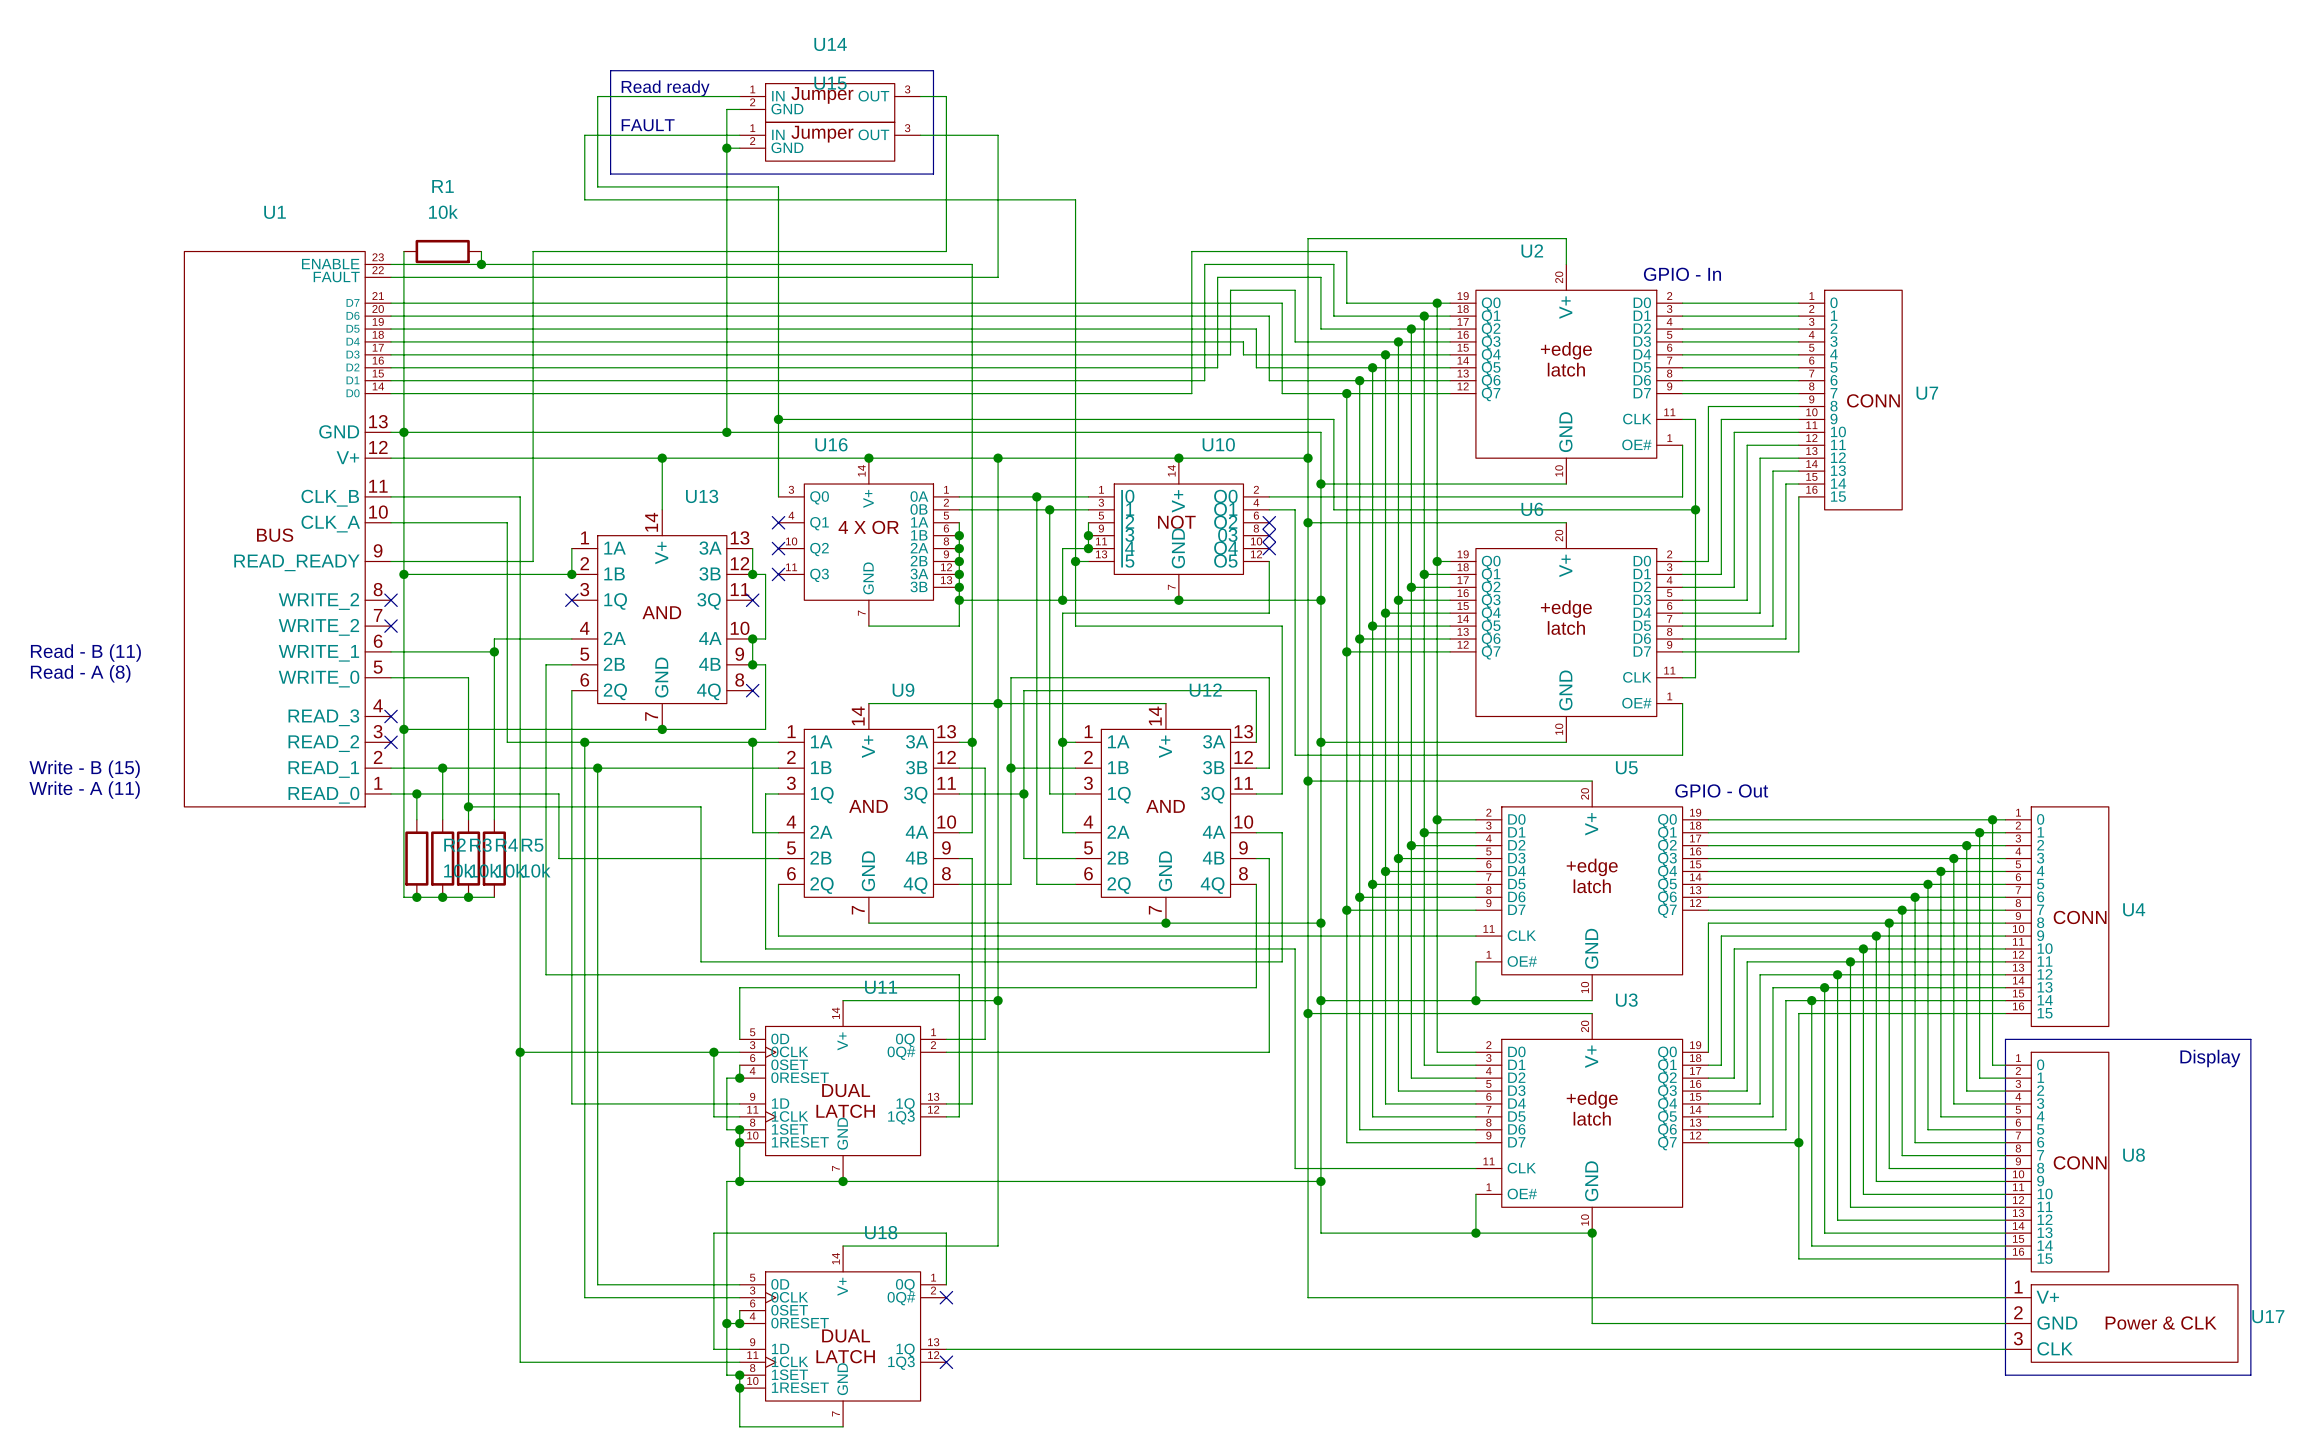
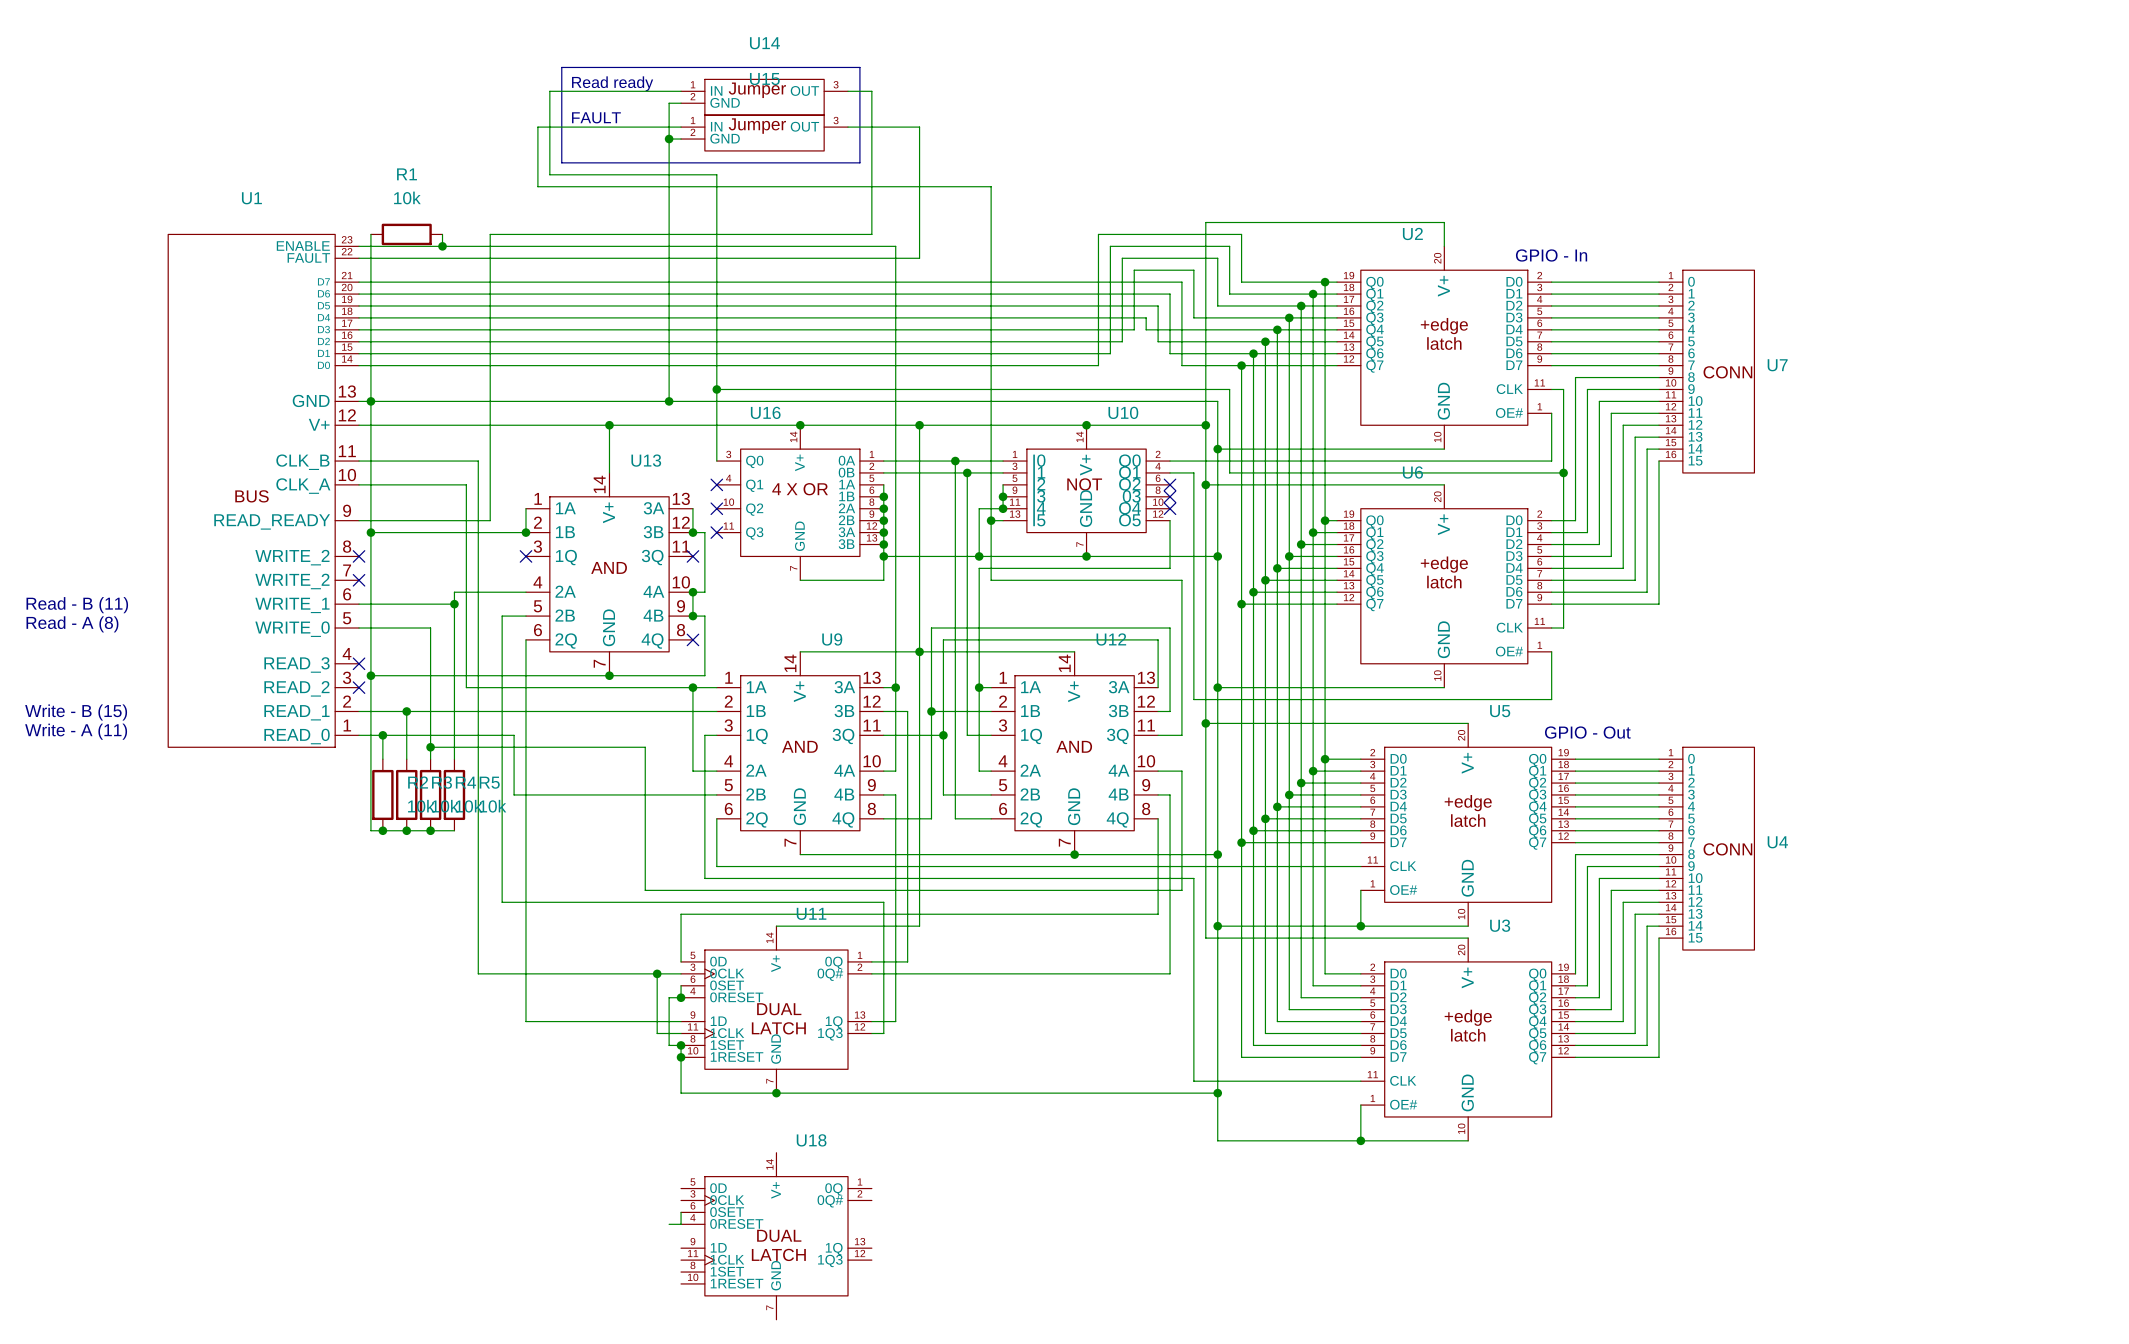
wire: (584, 742) (584, 1297) (739, 1297) -> none
junction: (584, 742) -> none
wire: (597, 768) (597, 1284) (739, 1284) -> none
junction: (597, 768) -> none
wire: (1798, 819) (2005, 819) -> none
wire: (1992, 819) (1992, 1065) (2005, 1065) -> none
junction: (1992, 819) -> none
wire: (1798, 832) (2005, 832) -> none
wire: (1979, 832) (1979, 1078) (2005, 1078) -> none
junction: (1979, 832) -> none
wire: (1798, 845) (2005, 845) -> none
wire: (1966, 845) (1966, 1091) (2005, 1091) -> none
junction: (1966, 845) -> none
wire: (1798, 858) (2005, 858) -> none
wire: (1953, 858) (1953, 1103) (2005, 1103) -> none
junction: (1953, 858) -> none
wire: (1798, 871) (2005, 871) -> none
wire: (1940, 871) (1940, 1116) (2005, 1116) -> none
junction: (1940, 871) -> none
wire: (1798, 884) (2005, 884) -> none
wire: (1927, 884) (1927, 1129) (2005, 1129) -> none
junction: (1927, 884) -> none
wire: (1798, 897) (2005, 897) -> none
wire: (1915, 897) (1915, 1142) (2005, 1142) -> none
junction: (1915, 897) -> none
wire: (1798, 910) (2005, 910) -> none
wire: (1902, 910) (1902, 1155) (2005, 1155) -> none
junction: (1902, 910) -> none
U4 position: (2057, 916) -> (1706, 848)
wire: (1798, 923) (2005, 923) -> none
wire: (1889, 923) (1889, 1168) (2005, 1168) -> none
junction: (1889, 923) -> none
wire: (1798, 936) (2005, 936) -> none
wire: (1876, 936) (1876, 1181) (2005, 1181) -> none
junction: (1876, 936) -> none
wire: (1798, 948) (2005, 948) -> none
wire: (1863, 948) (1863, 1194) (2005, 1194) -> none
junction: (1863, 948) -> none
wire: (1798, 961) (2005, 961) -> none
wire: (1850, 961) (1850, 1207) (2005, 1207) -> none
junction: (1850, 961) -> none
wire: (1798, 974) (2005, 974) -> none
wire: (1837, 974) (1837, 1220) (2005, 1220) -> none
junction: (1837, 974) -> none
wire: (1798, 987) (2005, 987) -> none
wire: (1824, 987) (1824, 1233) (2005, 1233) -> none
junction: (1824, 987) -> none
wire: (998, 1000) (998, 1246) (843, 1246) -> none
junction: (998, 1000) -> none
wire: (1798, 1000) (2005, 1000) -> none
wire: (1811, 1000) (1811, 1246) (2005, 1246) -> none
junction: (1811, 1000) -> none
wire: (1308, 1013) (1308, 1297) (2005, 1297) -> none
junction: (1308, 1013) -> none
wire: (1798, 1013) (2005, 1013) -> none
line: (2005, 1039) (2250, 1039) (2250, 1375) (2005, 1375) (2005, 1039) -> none
wire: (520, 1052) (520, 1362) (739, 1362) -> none
junction: (520, 1052) -> none
text: Display (2210, 1058) -> none
wire: (1798, 1142) (1798, 1258) (2005, 1258) -> none
junction: (1798, 1142) -> none
U8: (2057, 1162) -> none
wire: (739, 1181) (726, 1181) (726, 1375) (739, 1375) (739, 1426) (843, 1426) -> none
junction: (739, 1181) -> none
wire: (1592, 1233) (1592, 1323) (2005, 1323) -> none
junction: (1592, 1233) -> none
wire: (946, 1284) (946, 1233) (713, 1233) (713, 1349) (739, 1349) -> none
no-connect mark: (946, 1297) -> none
junction: (726, 1323) -> none
junction: (739, 1323) -> none
U17: (2121, 1323) -> none
wire: (946, 1349) (2005, 1349) -> none
no-connect mark: (946, 1362) -> none
junction: (739, 1375) -> none
junction: (739, 1388) -> none

